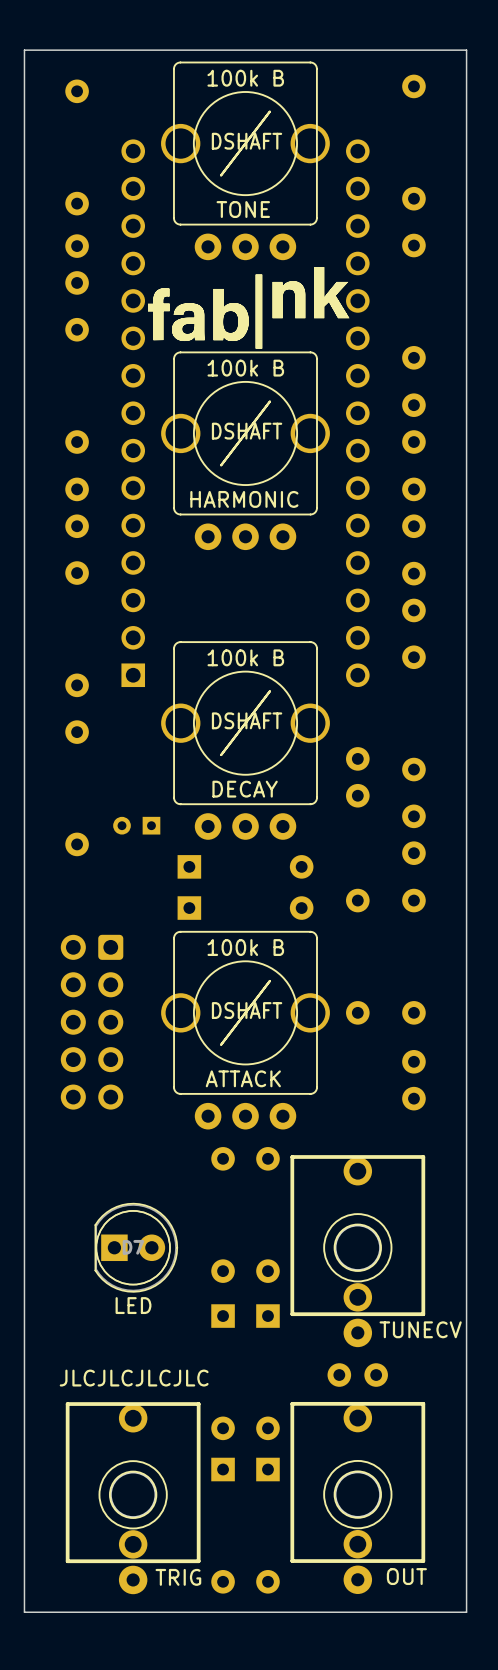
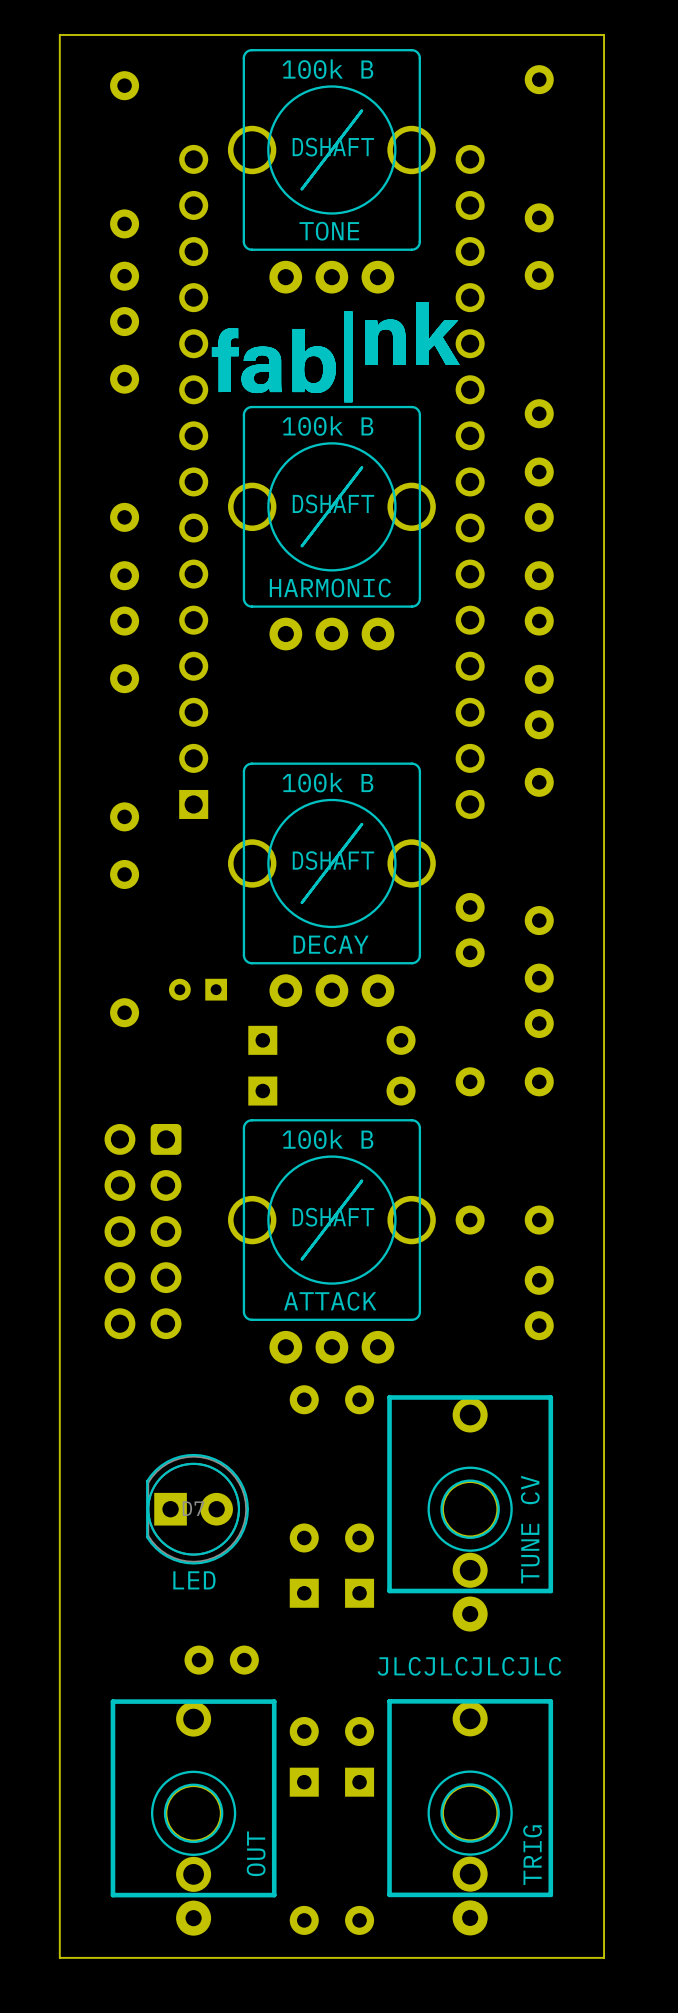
part value: TUNECV (420, 1329) -> TUNE CV (530, 1529)
part position: (357, 1375) -> (221, 1660)
text position: JLCJLCJLCJLC (134, 1378) -> JLCJLCJLCJLC (469, 1666)
part value: OUT (406, 1576) -> TRIG (532, 1855)
part value: TRIG (178, 1577) -> OUT (256, 1853)

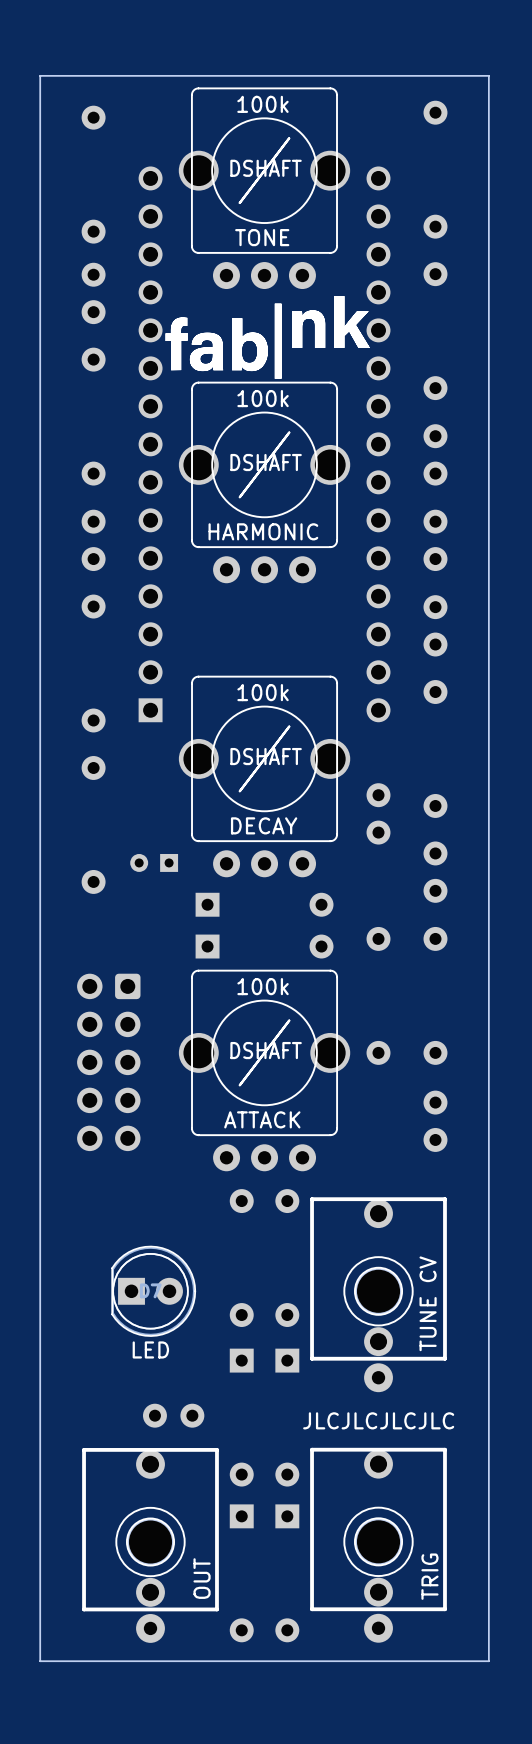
part value: 100k B (327, 69) -> 100k (262, 104)
part value: 100k B (327, 426) -> 100k (263, 398)
part value: 100k B (327, 782) -> 100k (263, 692)
part value: 100k B (327, 1139) -> 100k (263, 986)

